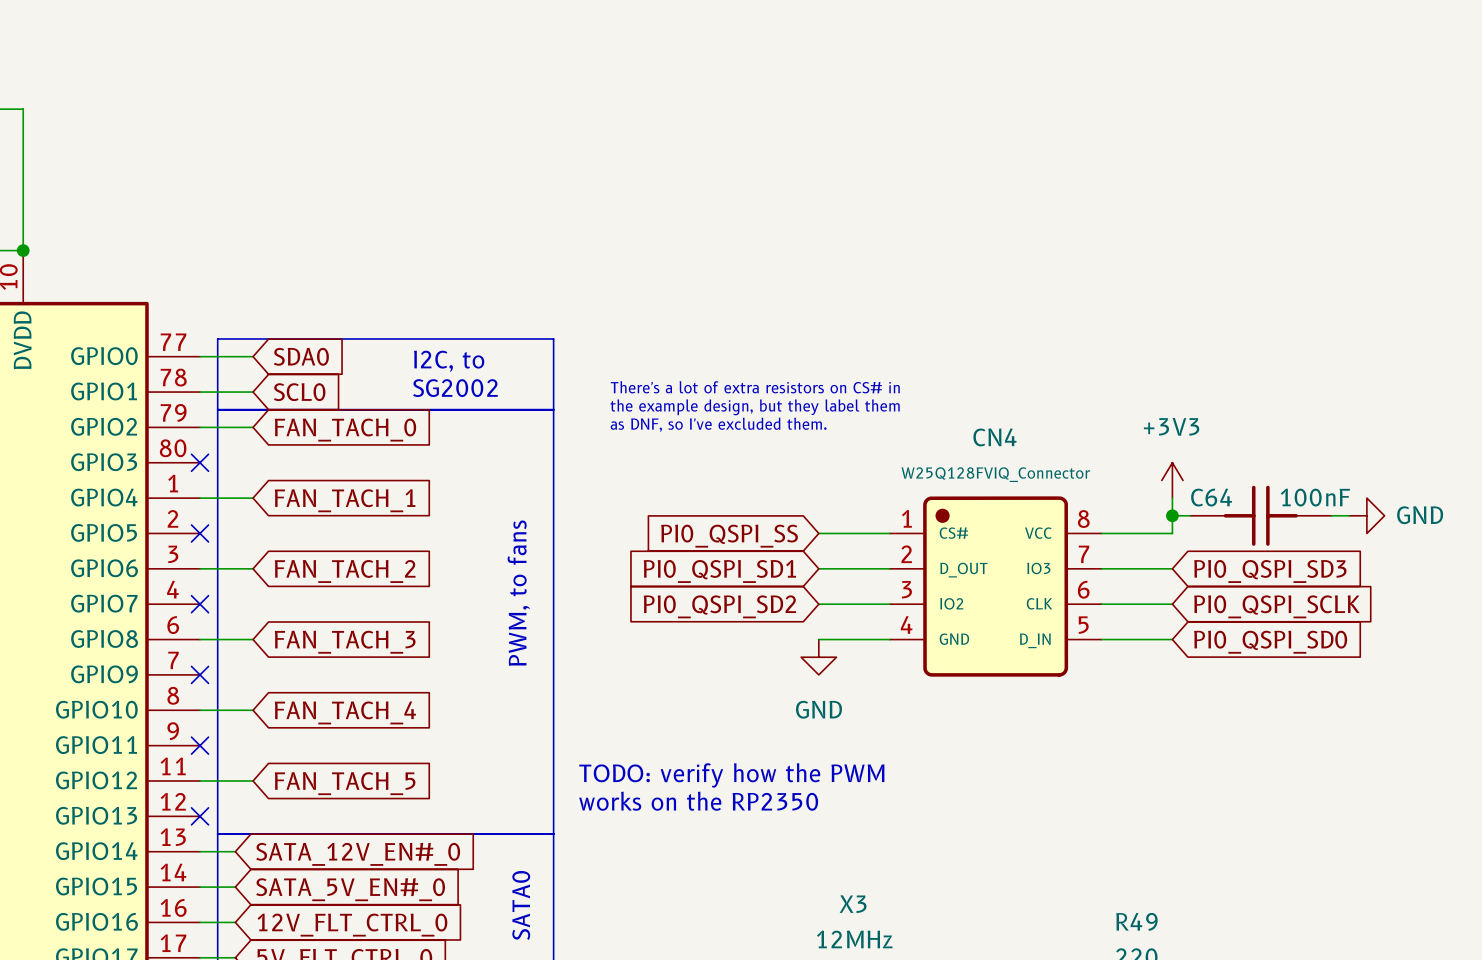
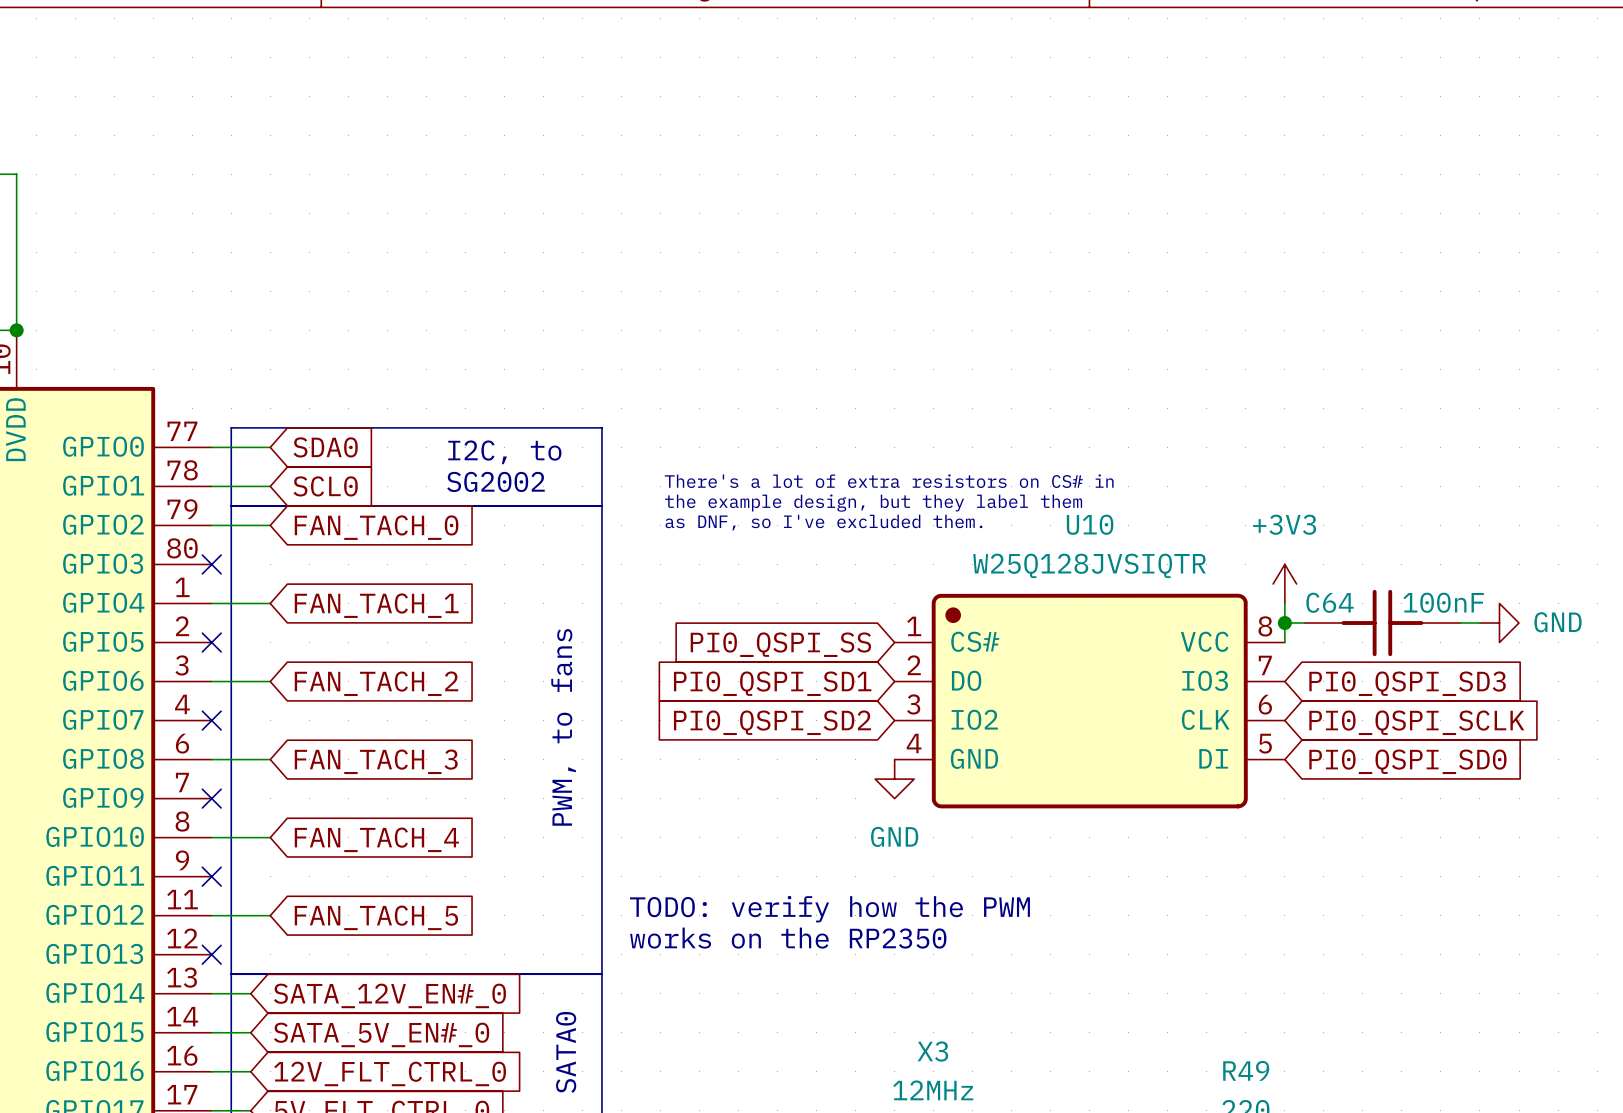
CN4: W25Q128FVIQ_Connector (995, 586) -> none
U10: none -> W25Q128JVSIQTR (1089, 701)

